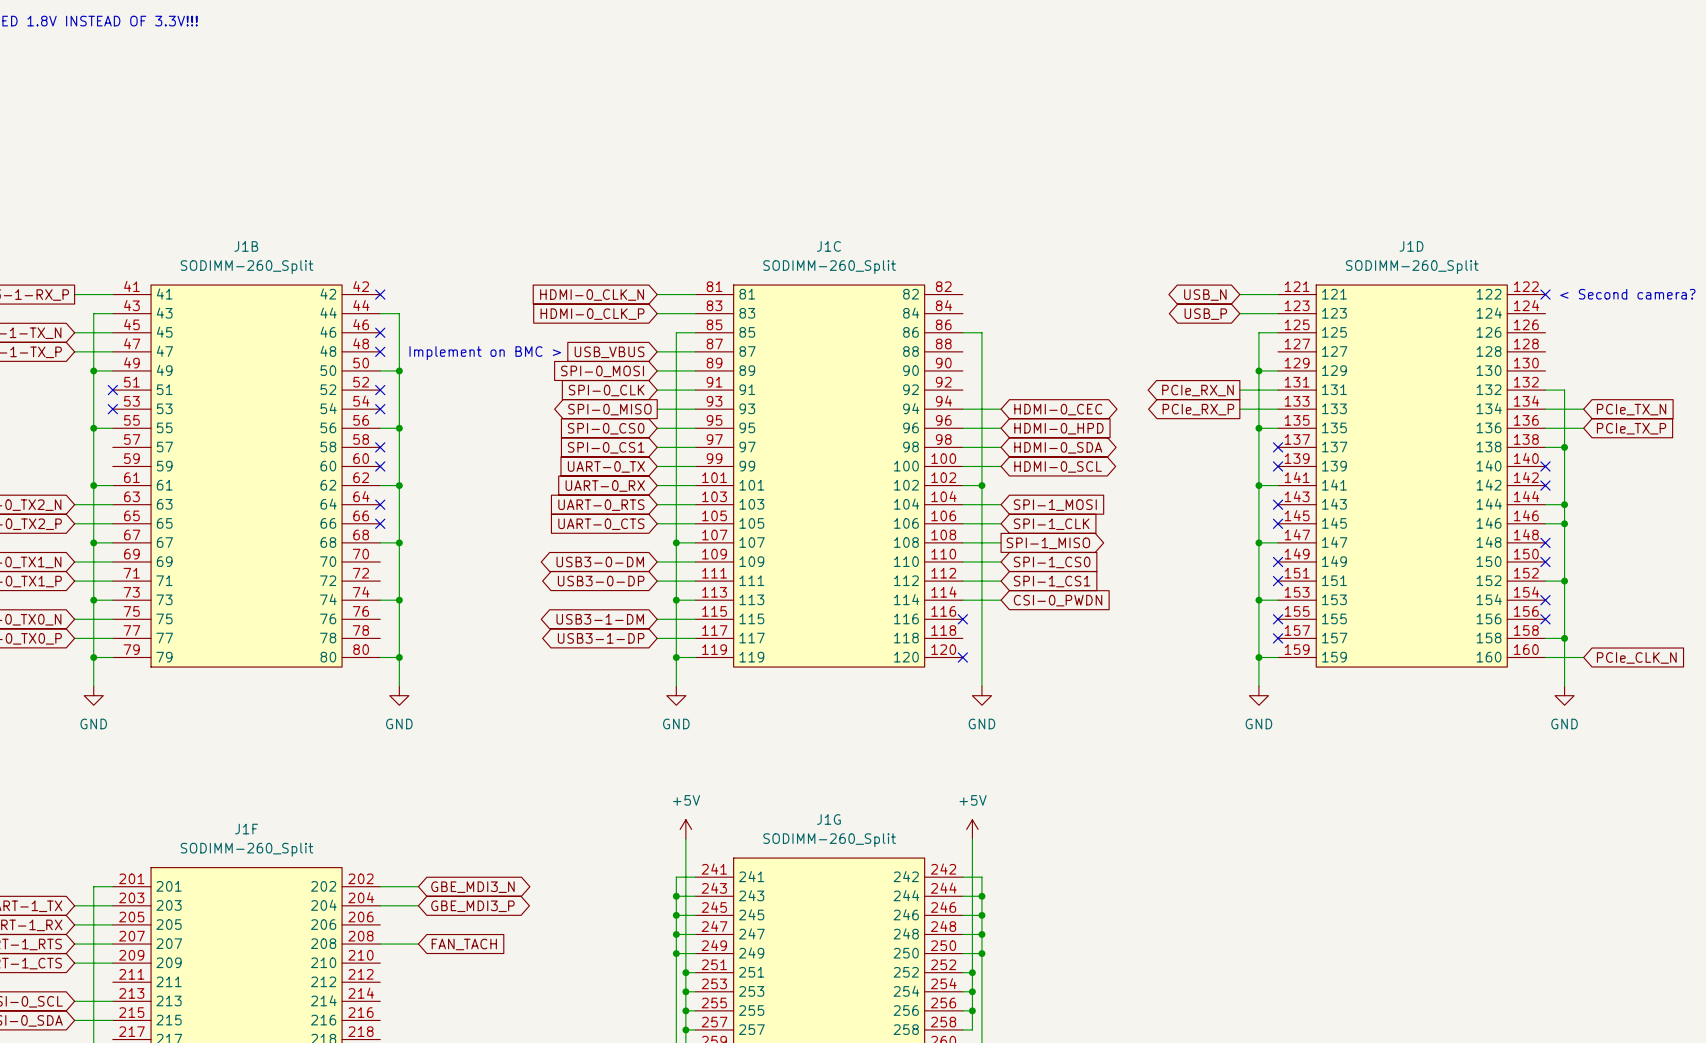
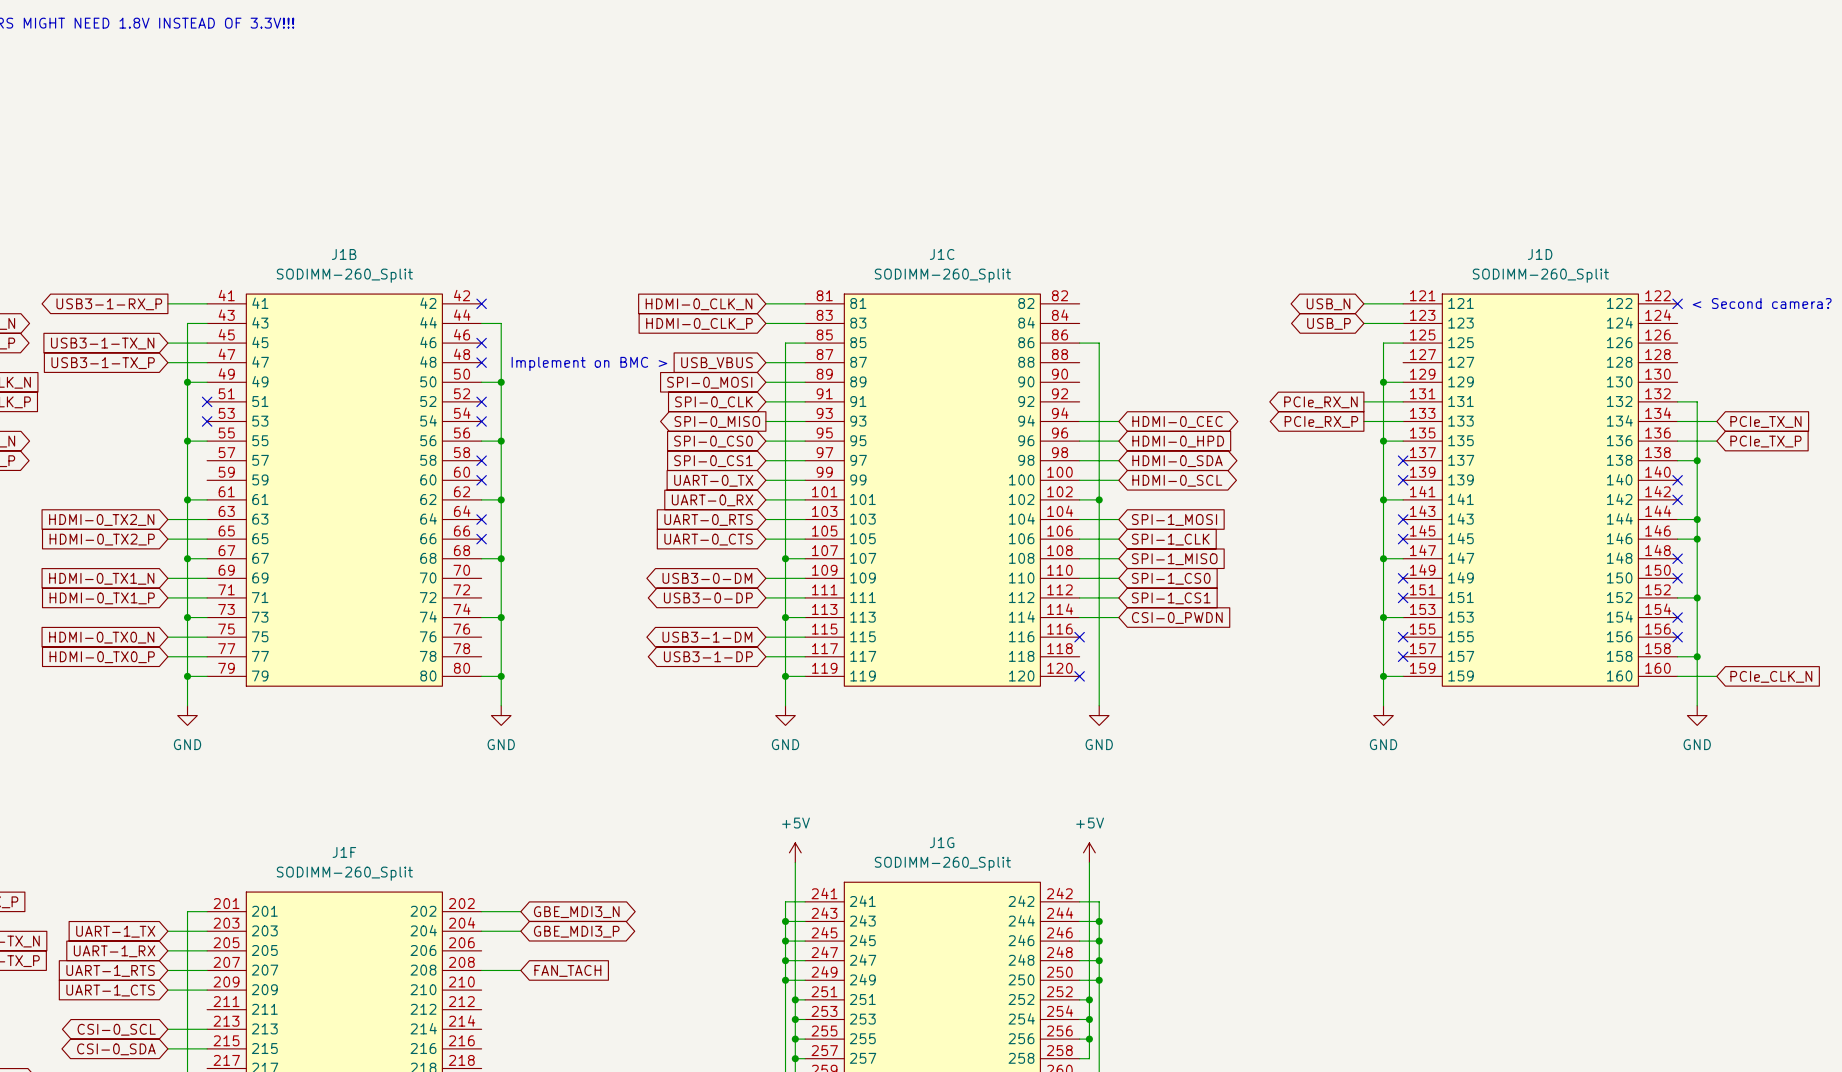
global label shape: output (1048, 543) -> input (1174, 559)

